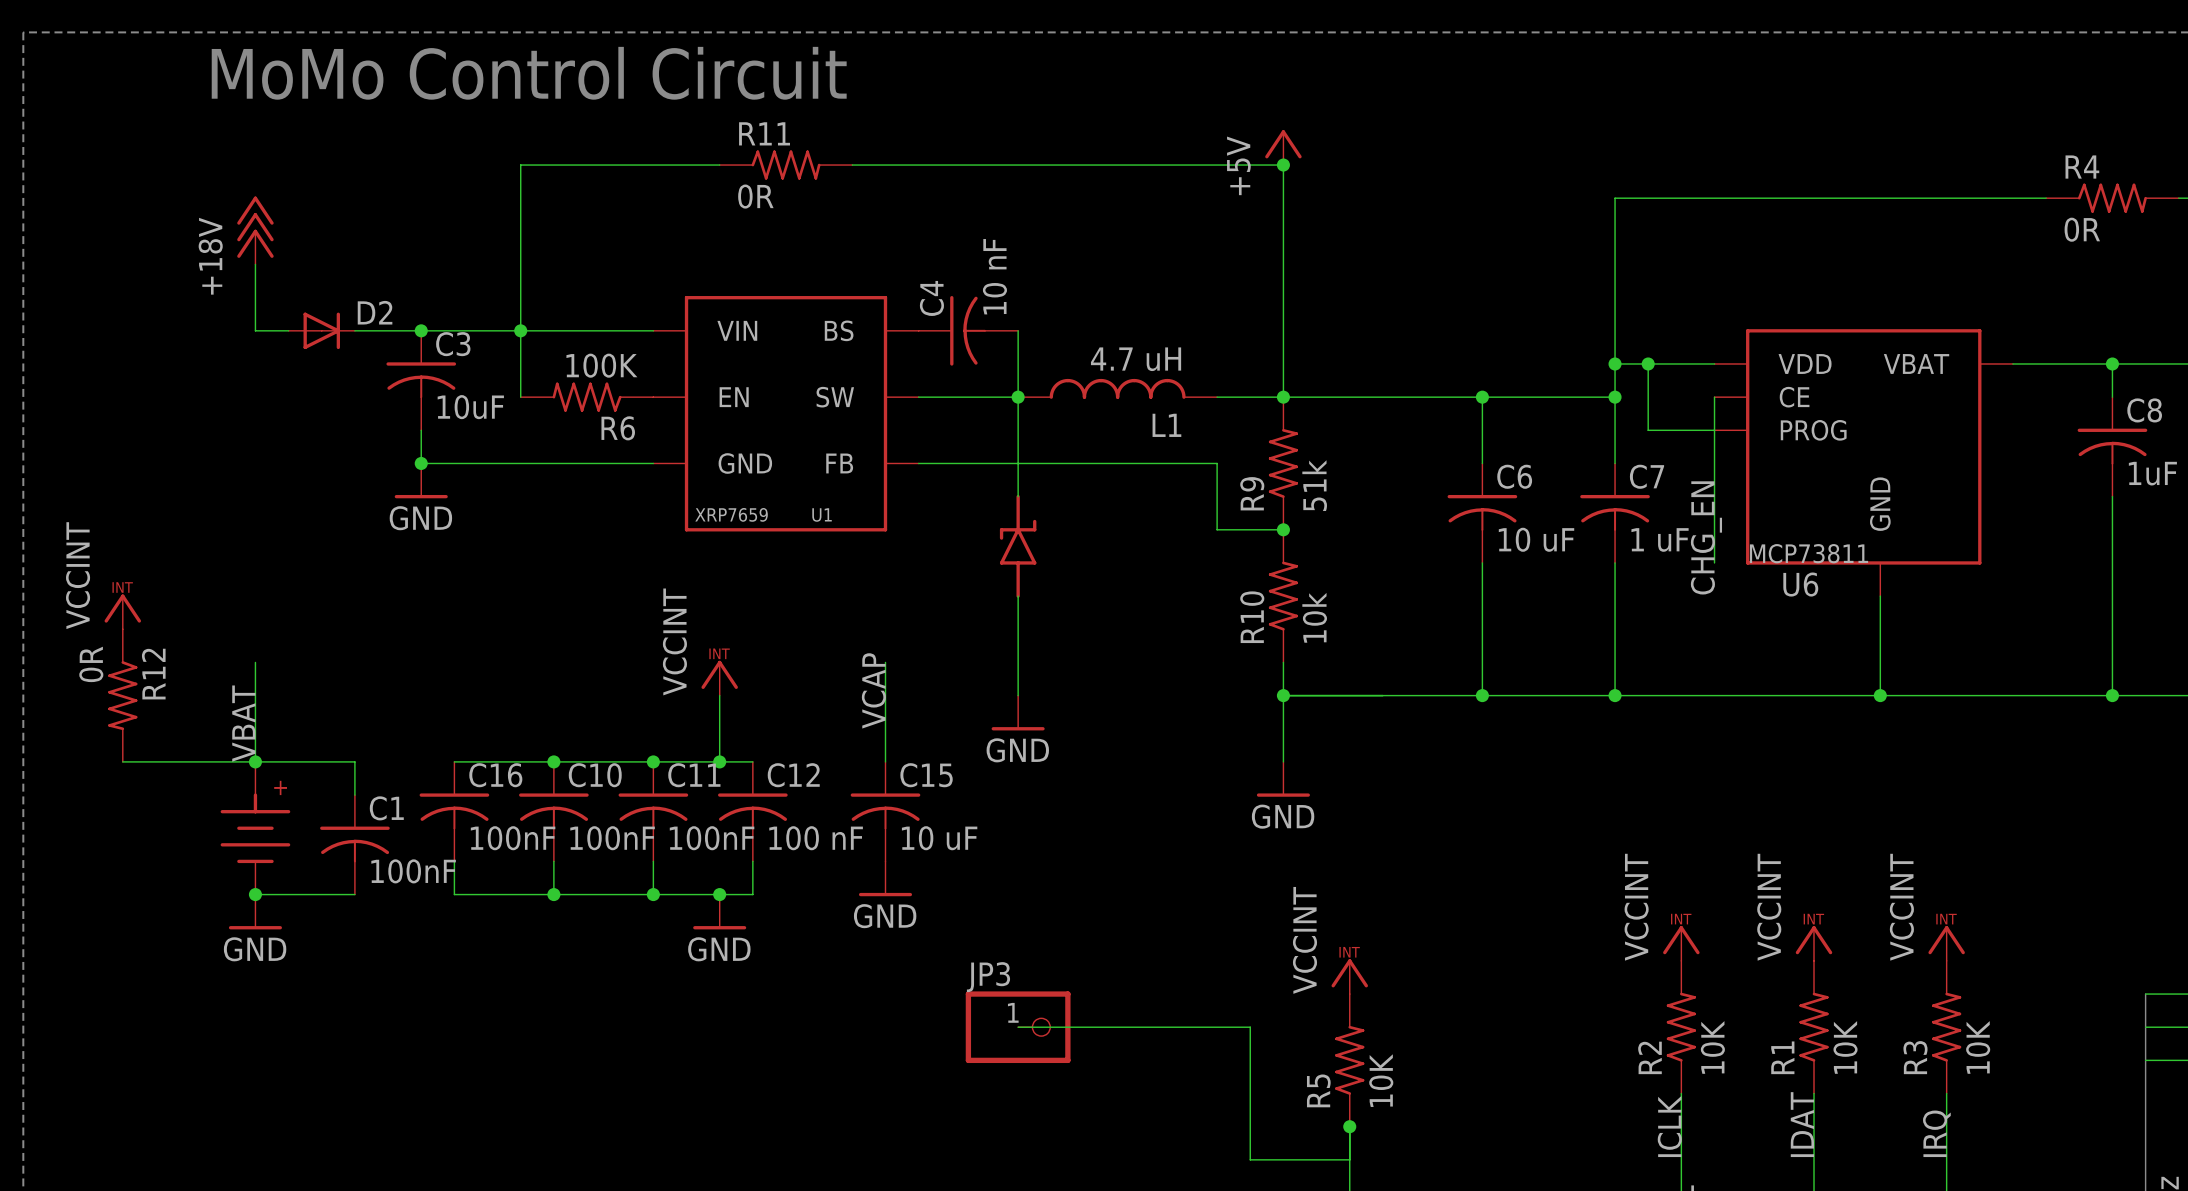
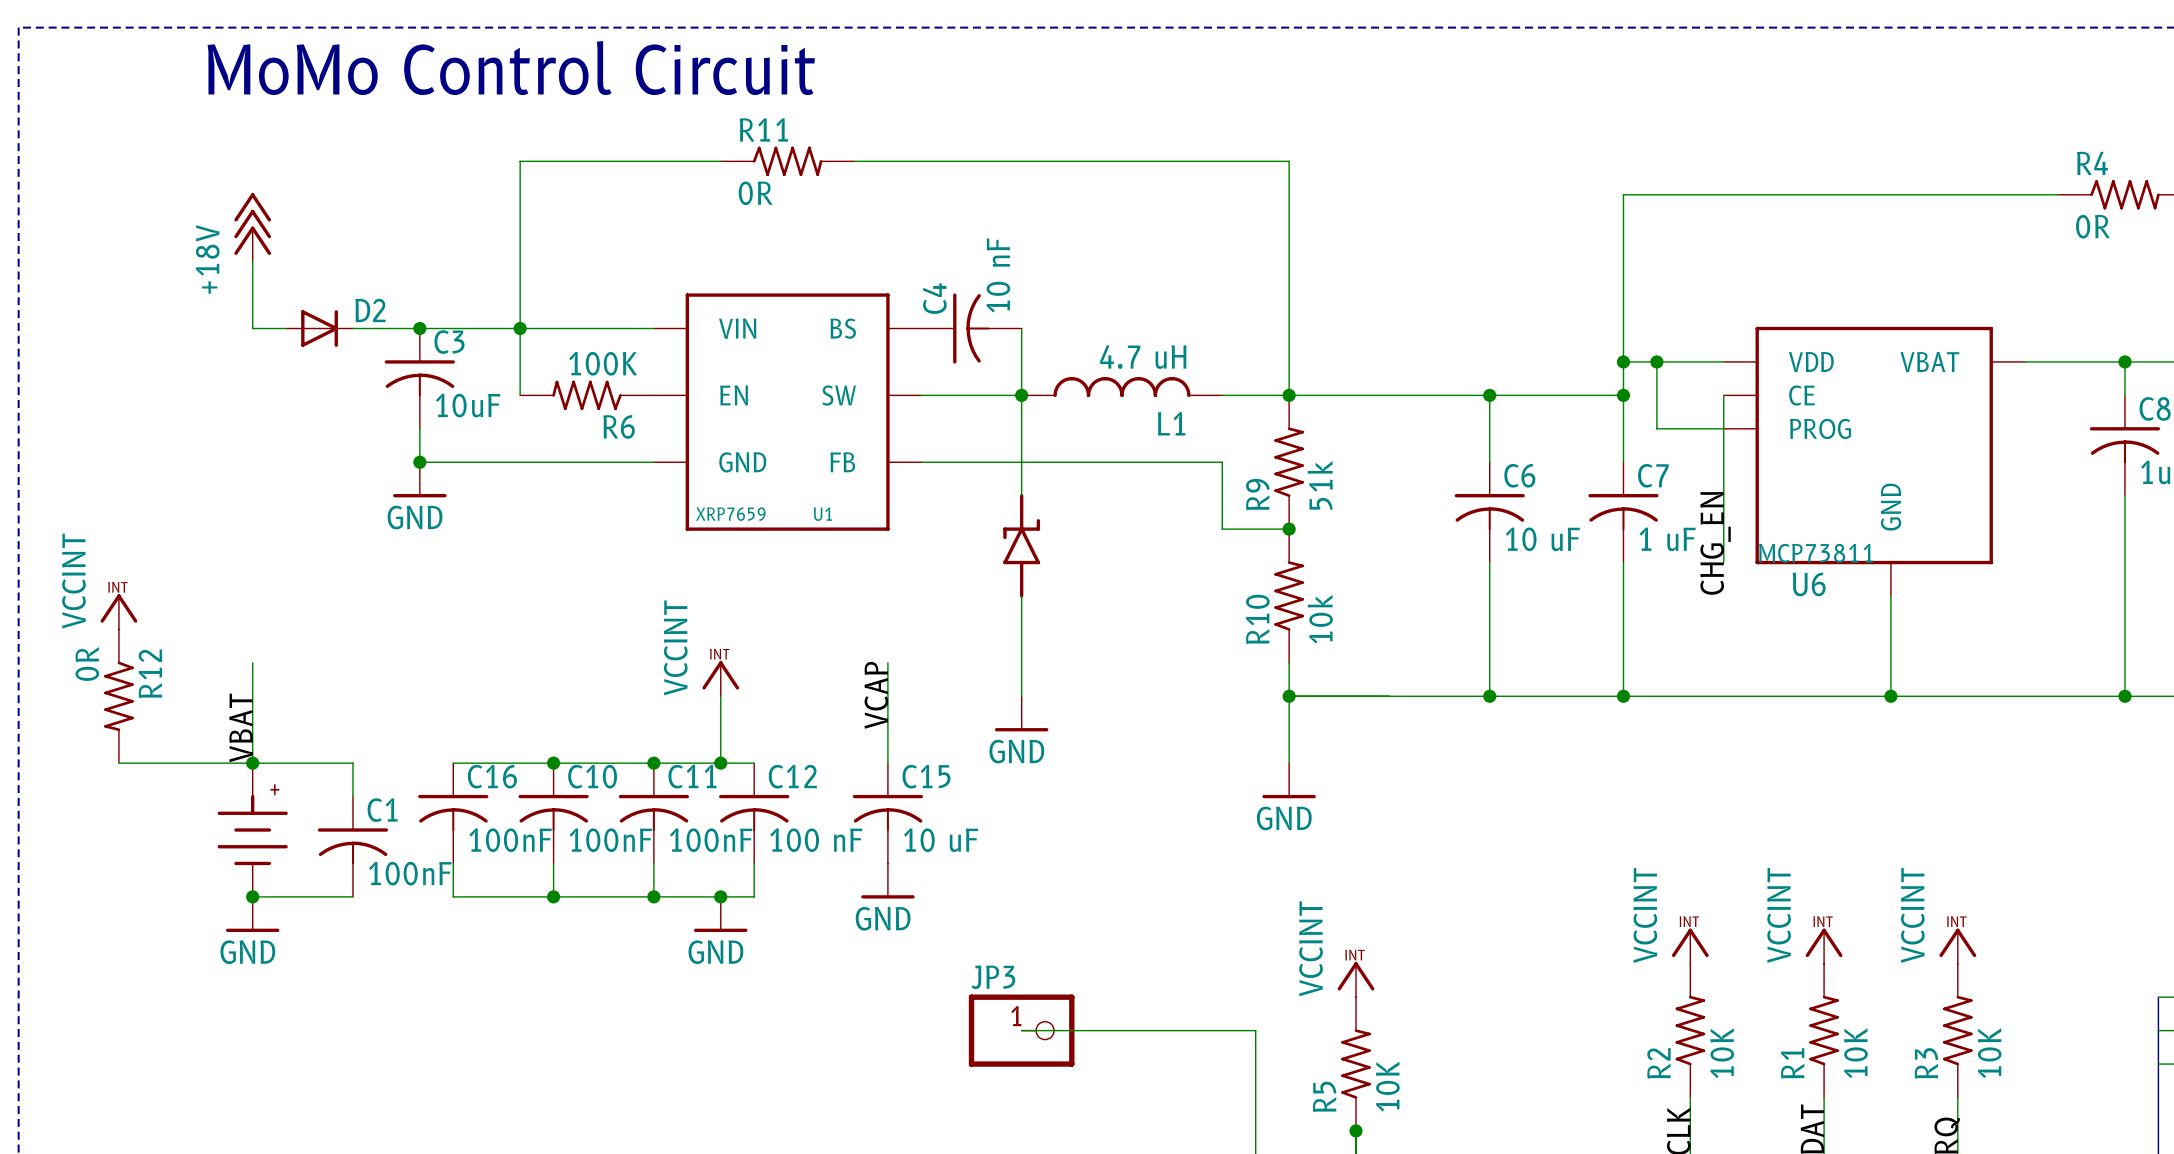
power symbol: +5V (1283, 147) -> none
junction: (1283, 165) -> none

